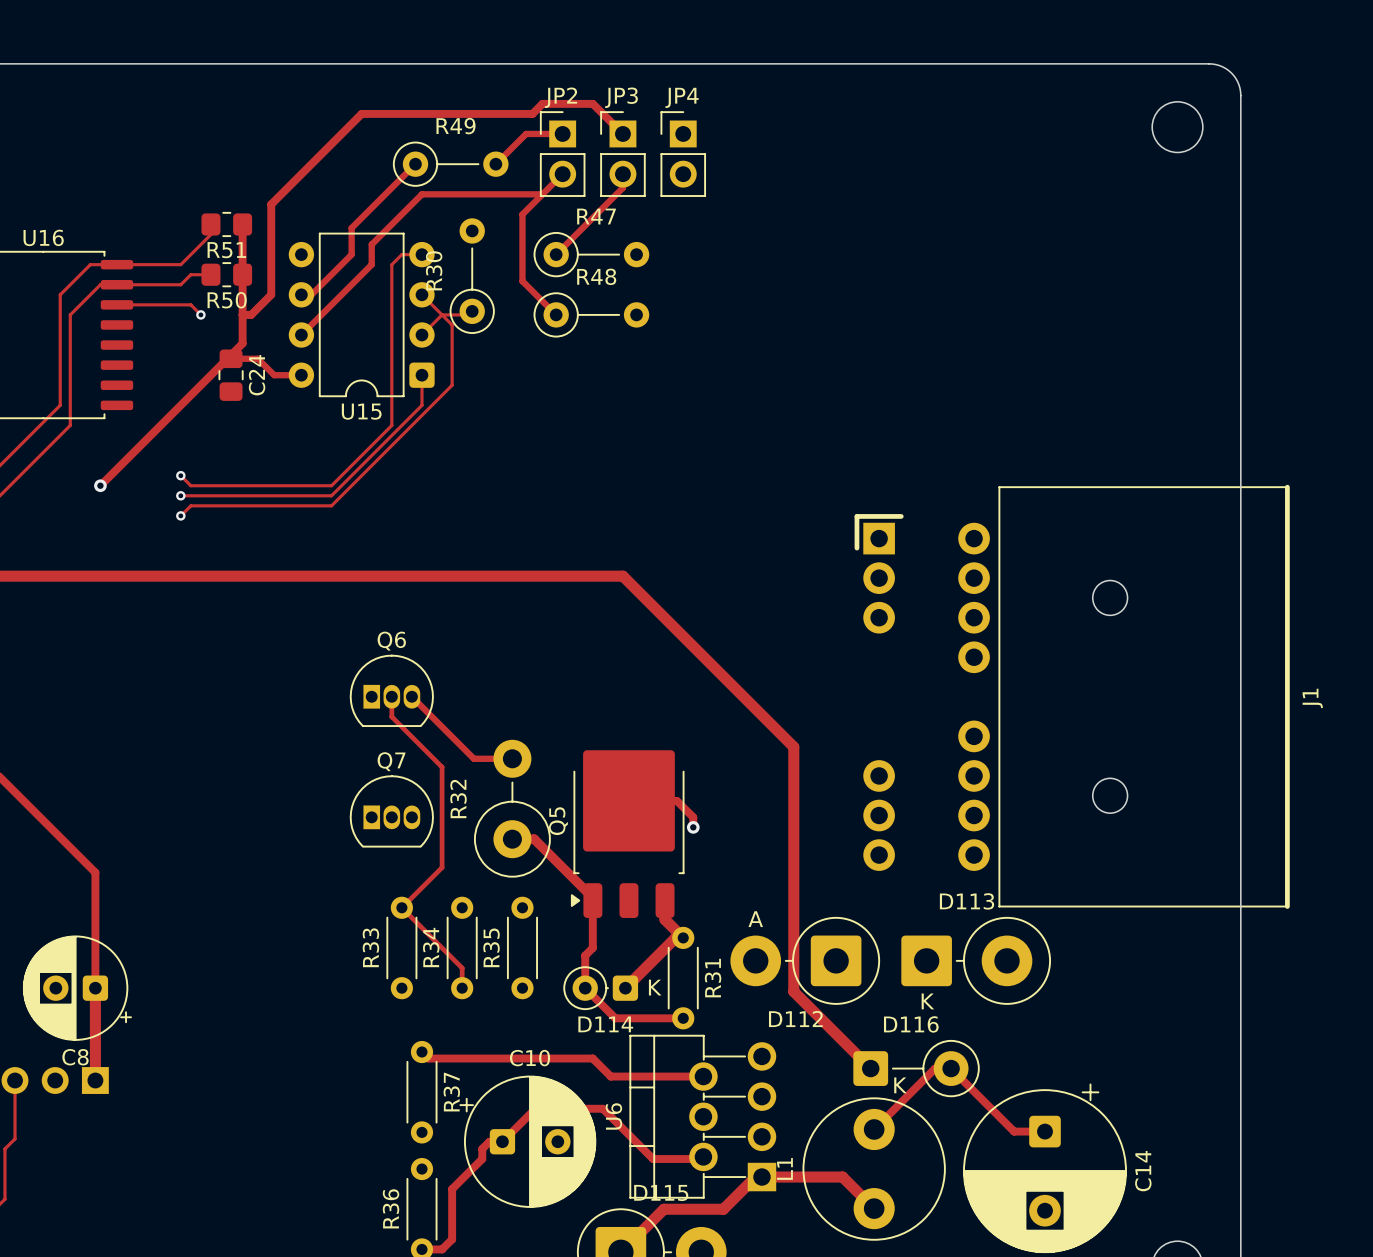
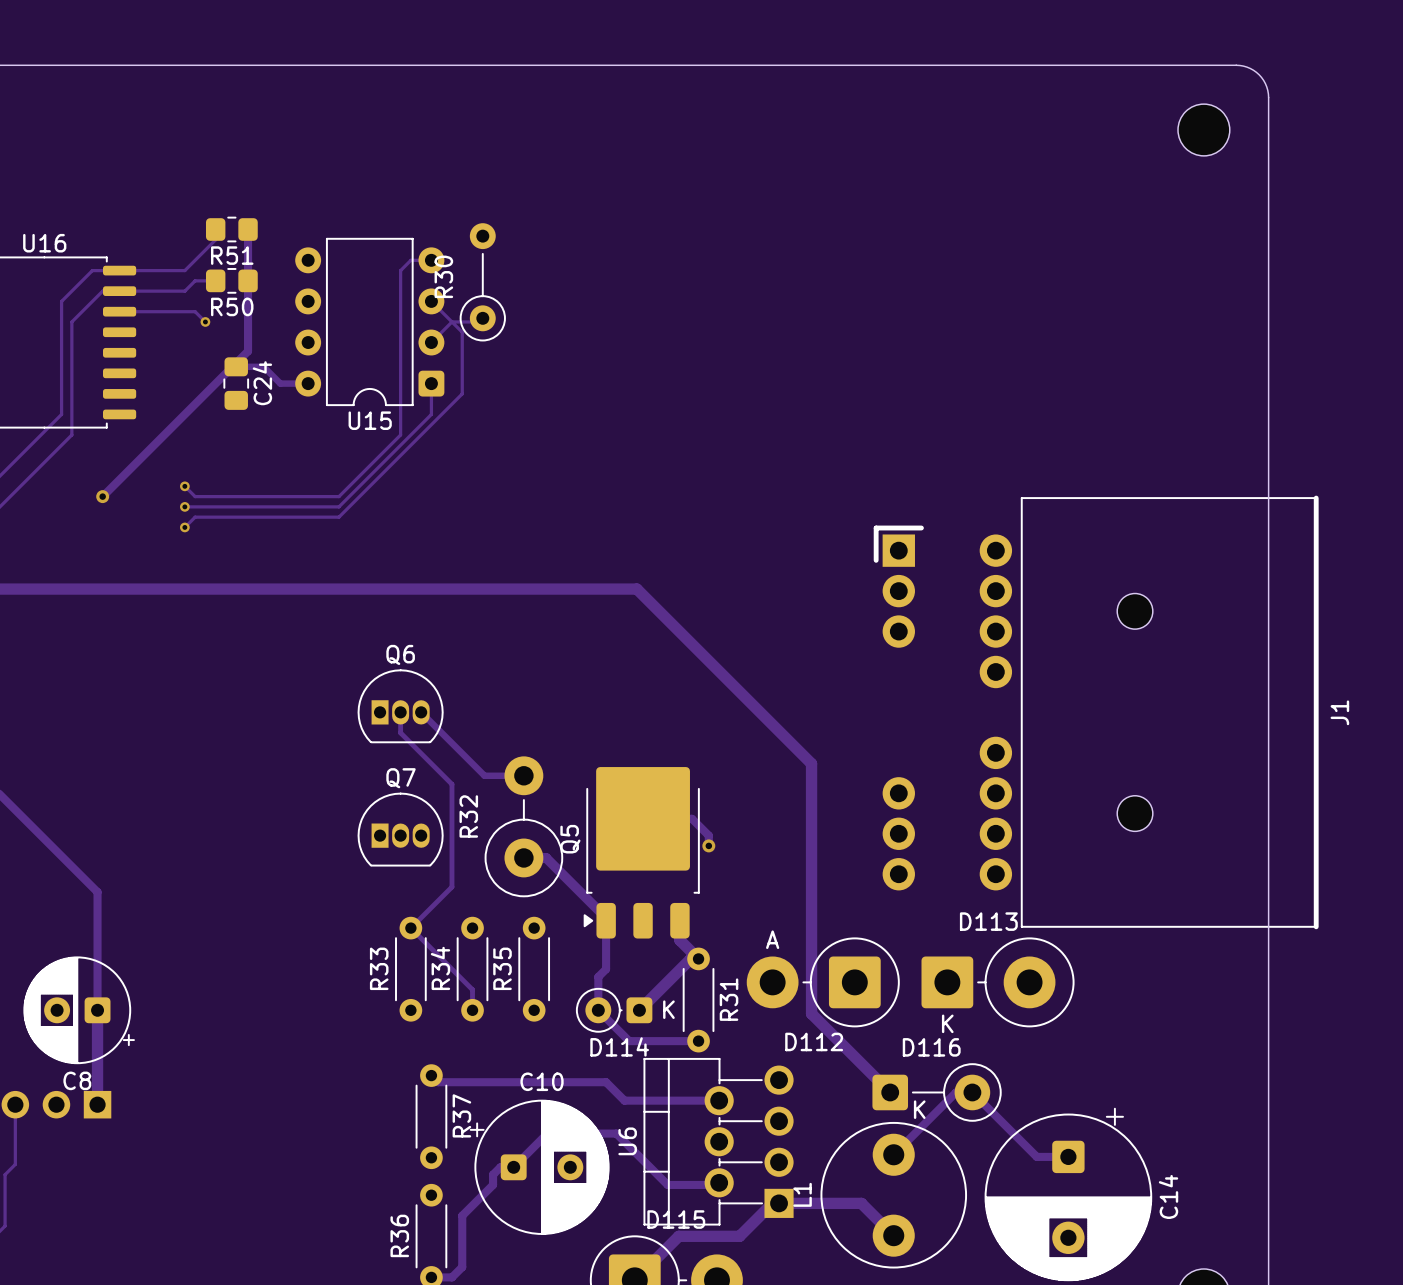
track: (562, 133) (526, 133) (495, 164) -> none
track: (622, 133) (592, 103) (542, 103) (532, 113) (361, 113) (271, 204) (271, 294) (251, 314) (242, 314) -> none
JP2: (562, 154) -> none
JP3: (622, 154) -> none
JP4: (683, 154) -> none
track: (415, 164) (351, 228) (351, 254) (311, 294) (301, 294) -> none
R49: (450, 164) -> none
track: (562, 174) (522, 214) (522, 281) (556, 314) -> none
track: (622, 174) (622, 187) (556, 254) -> none
track: (542, 194) (421, 194) (371, 244) (371, 264) (301, 335) -> none
R47: (591, 254) -> none
R48: (591, 314) -> none

